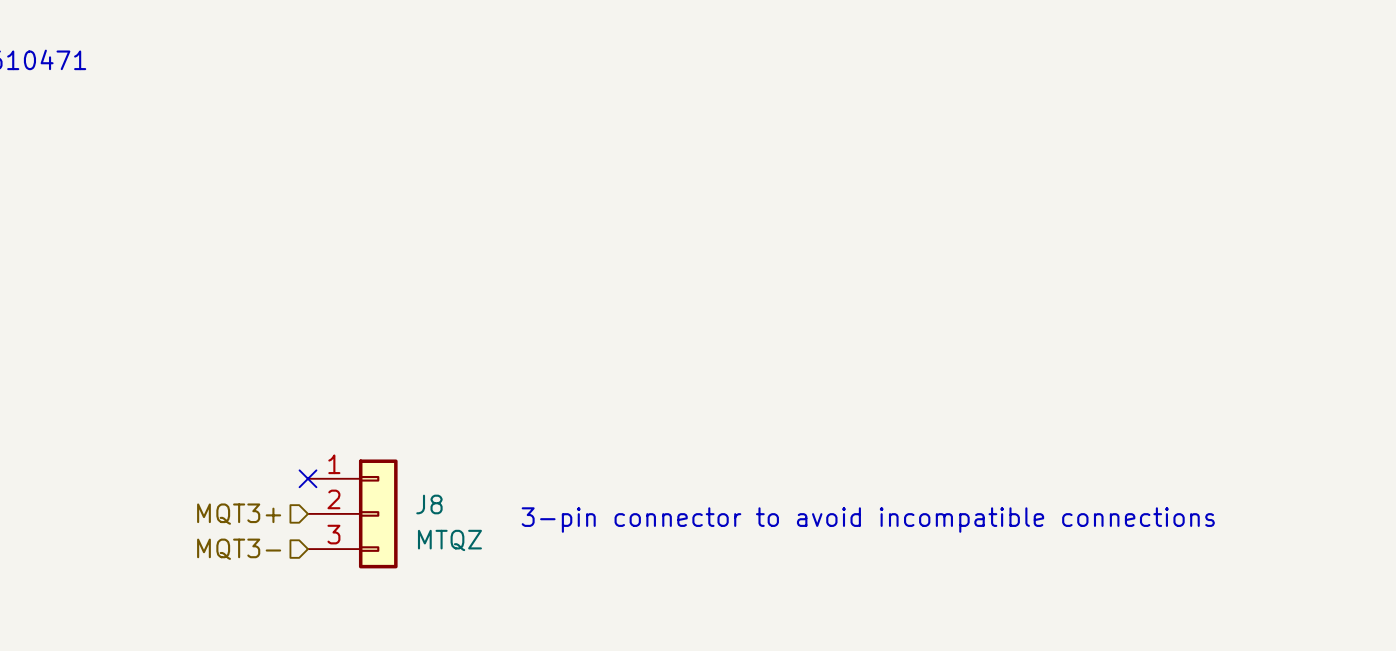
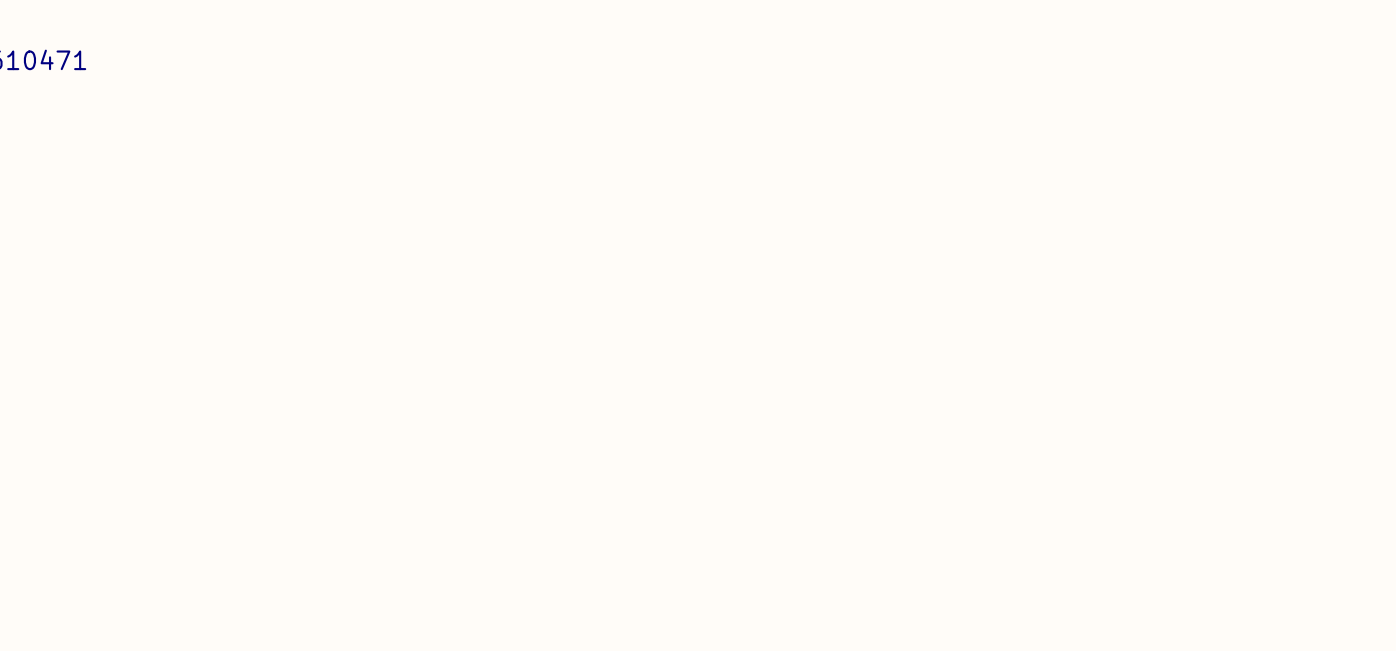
no-connect mark: (308, 478) -> none
J8: MTQZ (352, 513) -> none
hierarchical label: MQT3+ (239, 514) -> none
text: 3-pin connector to avoid incompatible connections (868, 520) -> none
hierarchical label: MQT3- (239, 549) -> none

